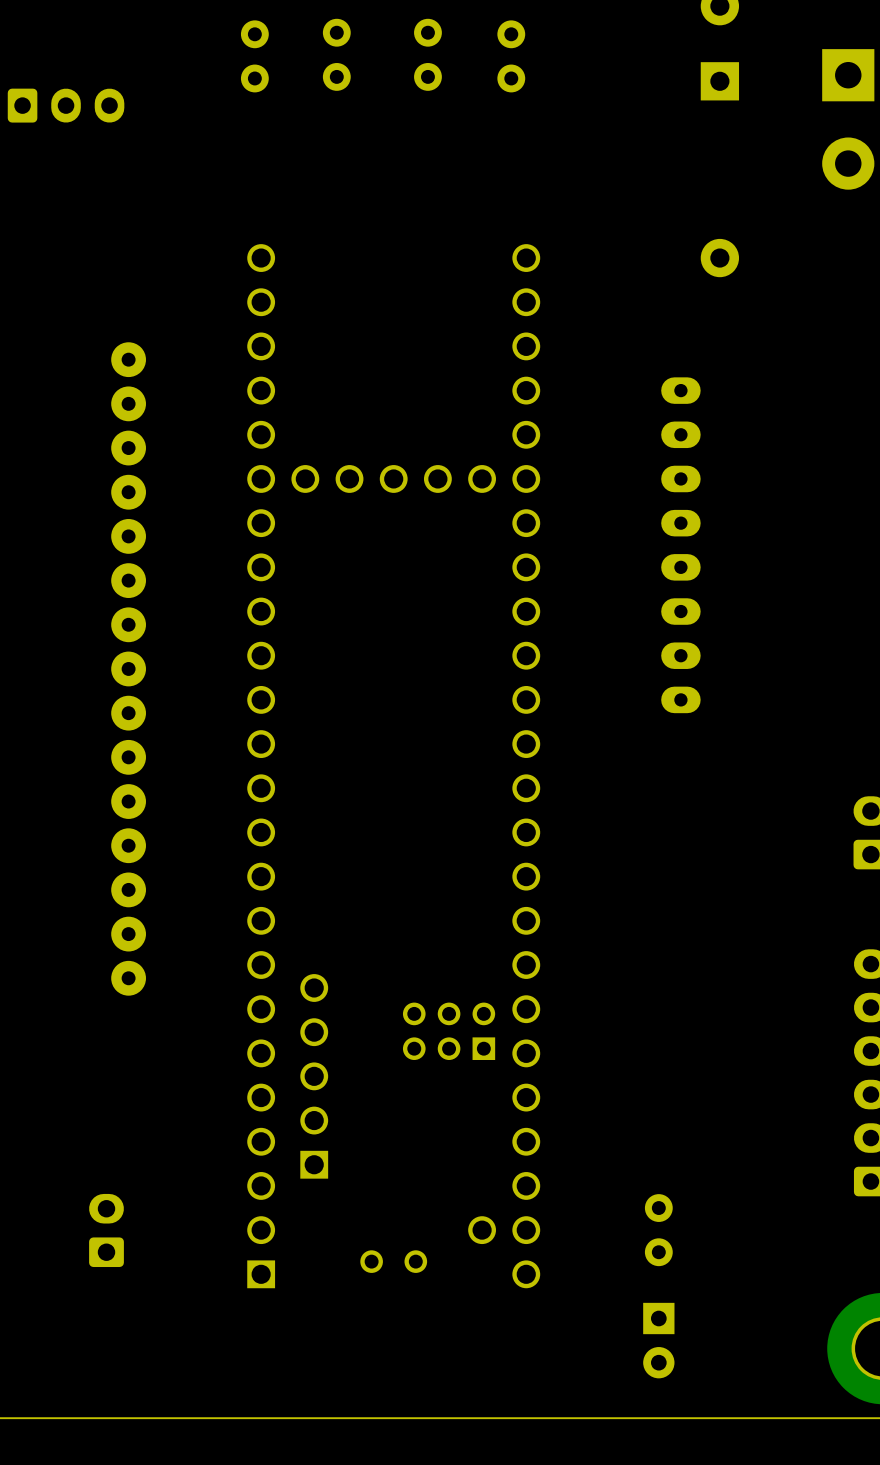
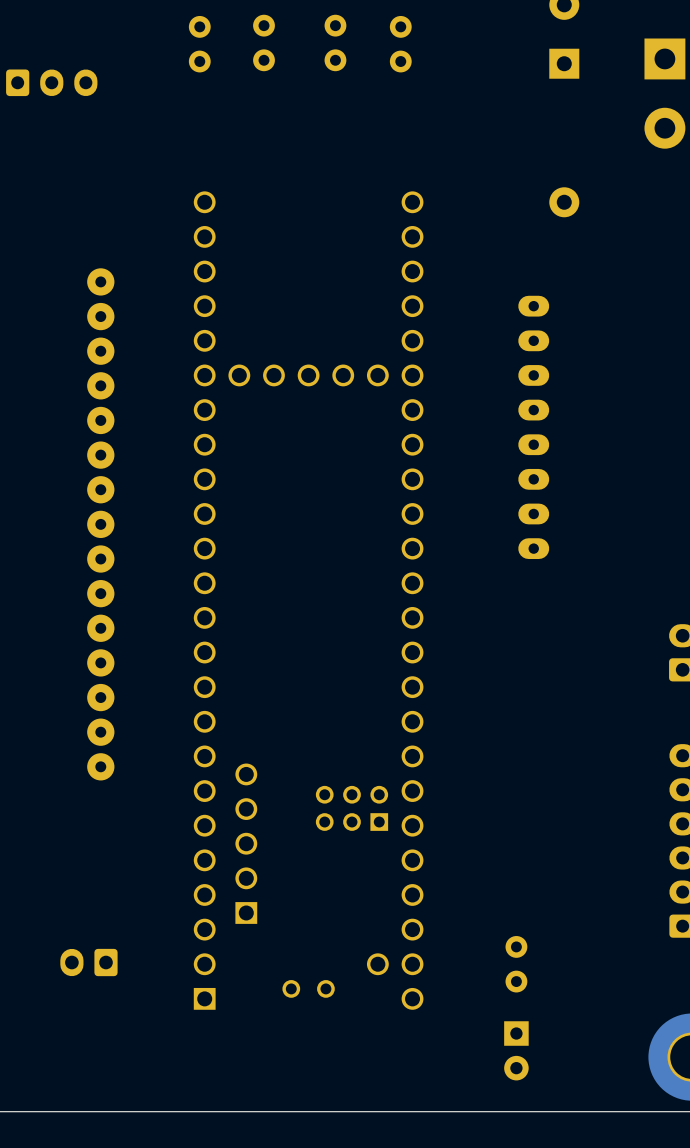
part rotation: 0° (106, 1230) -> 90° counterclockwise (88, 962)

